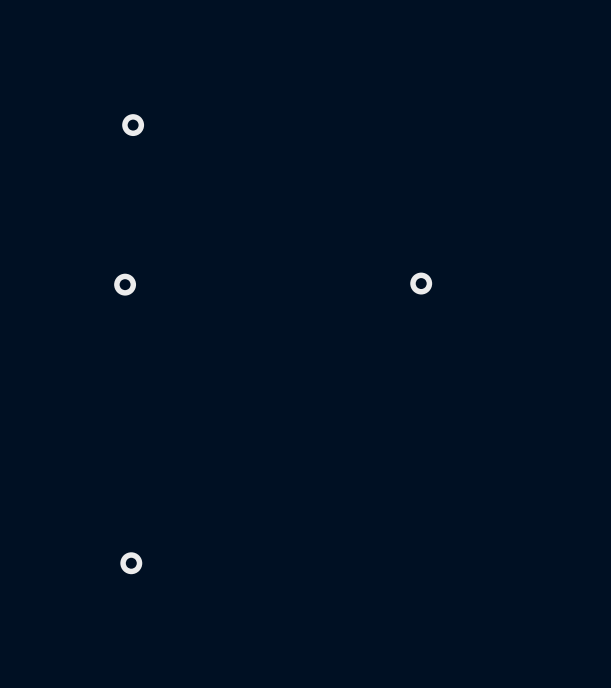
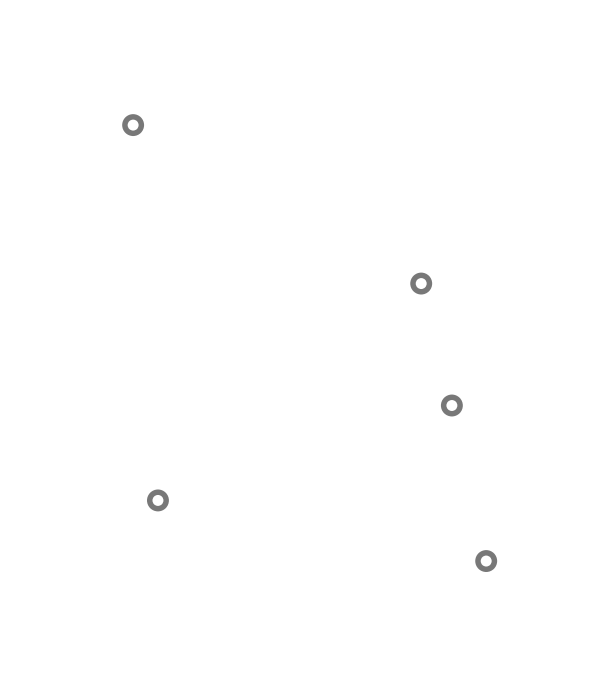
via: (125, 284) -> none
via: none -> (451, 405)
via: none -> (486, 561)
via position: (131, 563) -> (157, 500)

